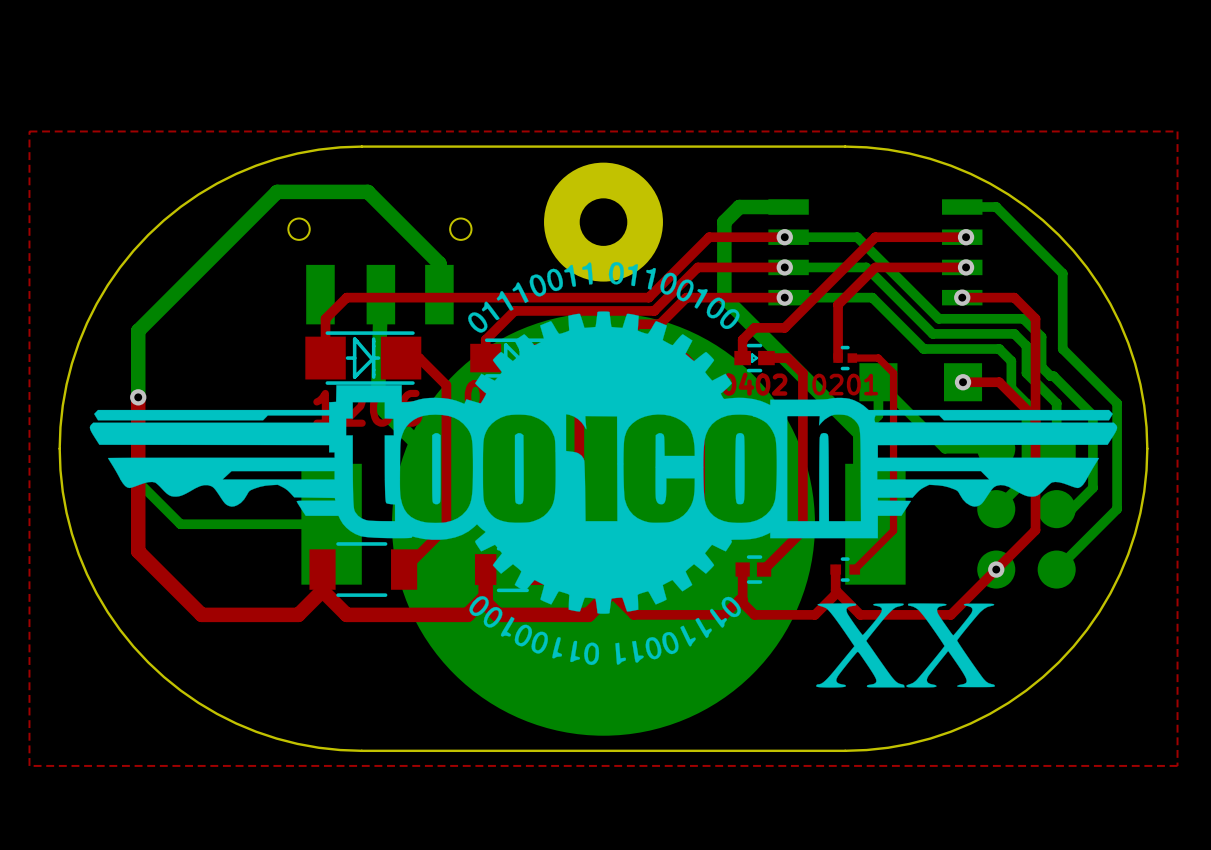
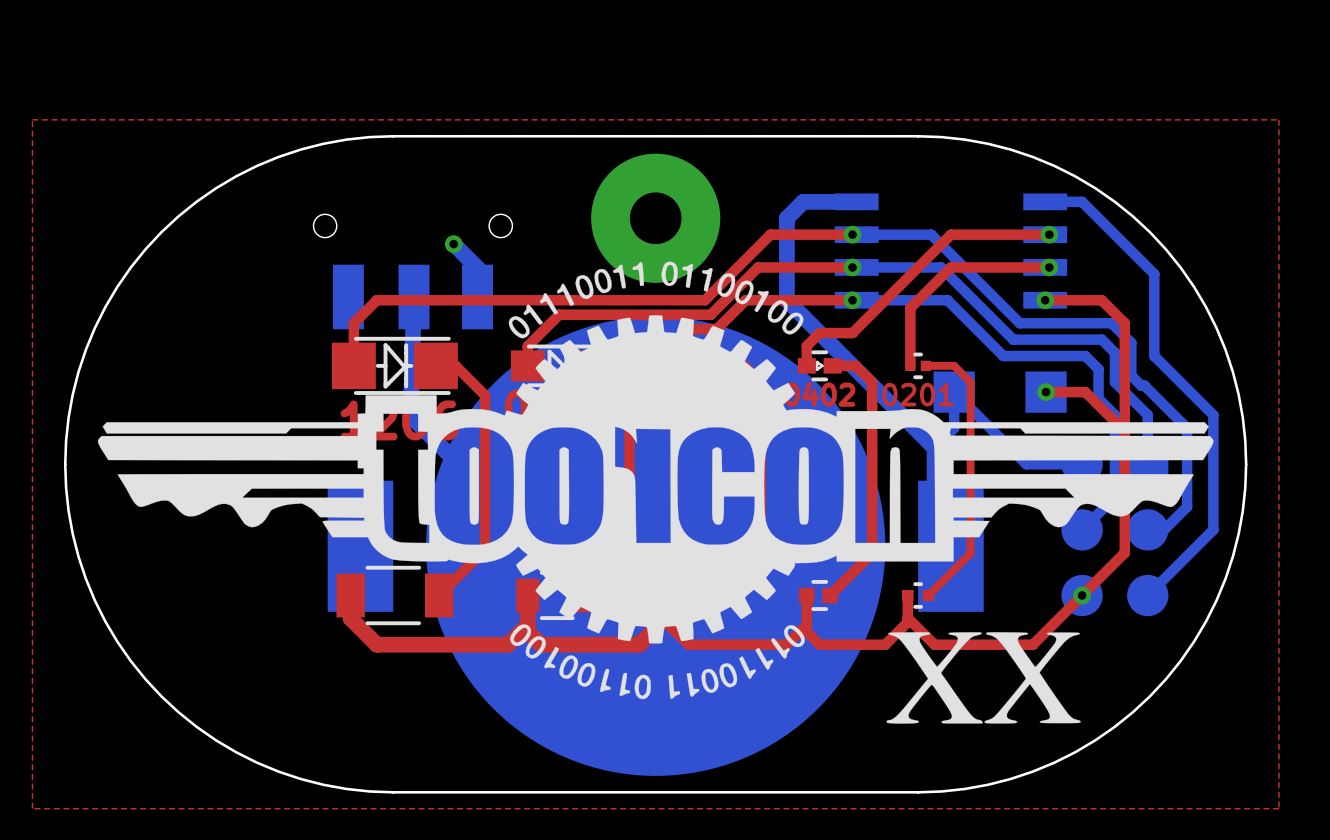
via: none -> (453, 244)
bottom track: (439, 267) (439, 263) (367, 191) (277, 191) (138, 330) (138, 397) -> (477, 267) (453, 244)
top track: (138, 397) (138, 551) (201, 614) (298, 614) (322, 590) -> none
via: (138, 397) -> none
bottom track: (138, 481) (180, 524) (331, 524) -> none

